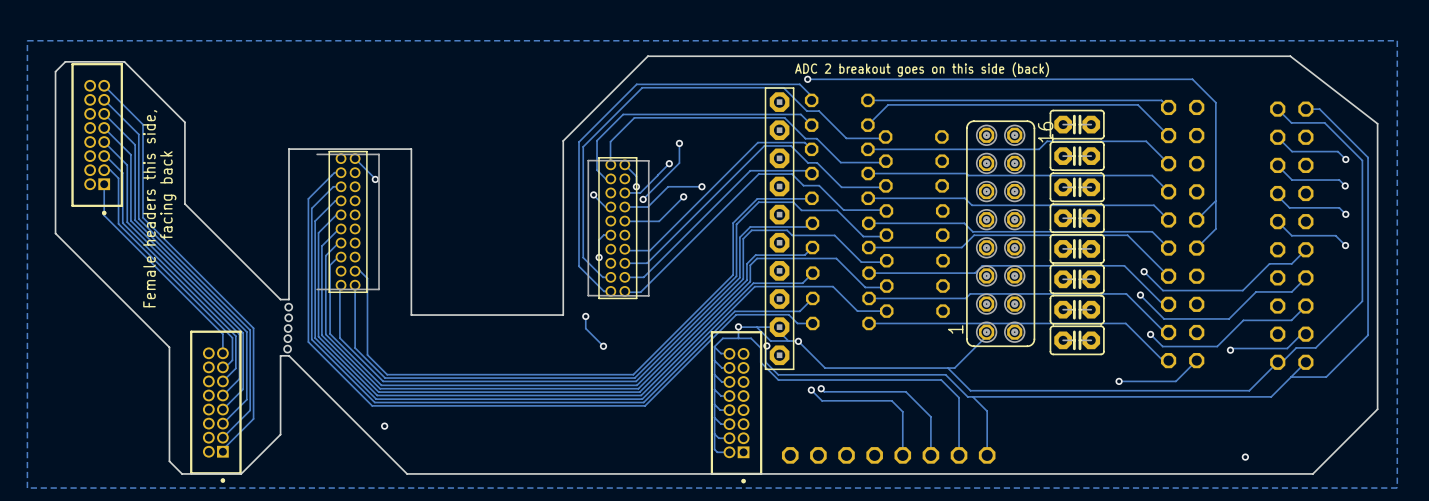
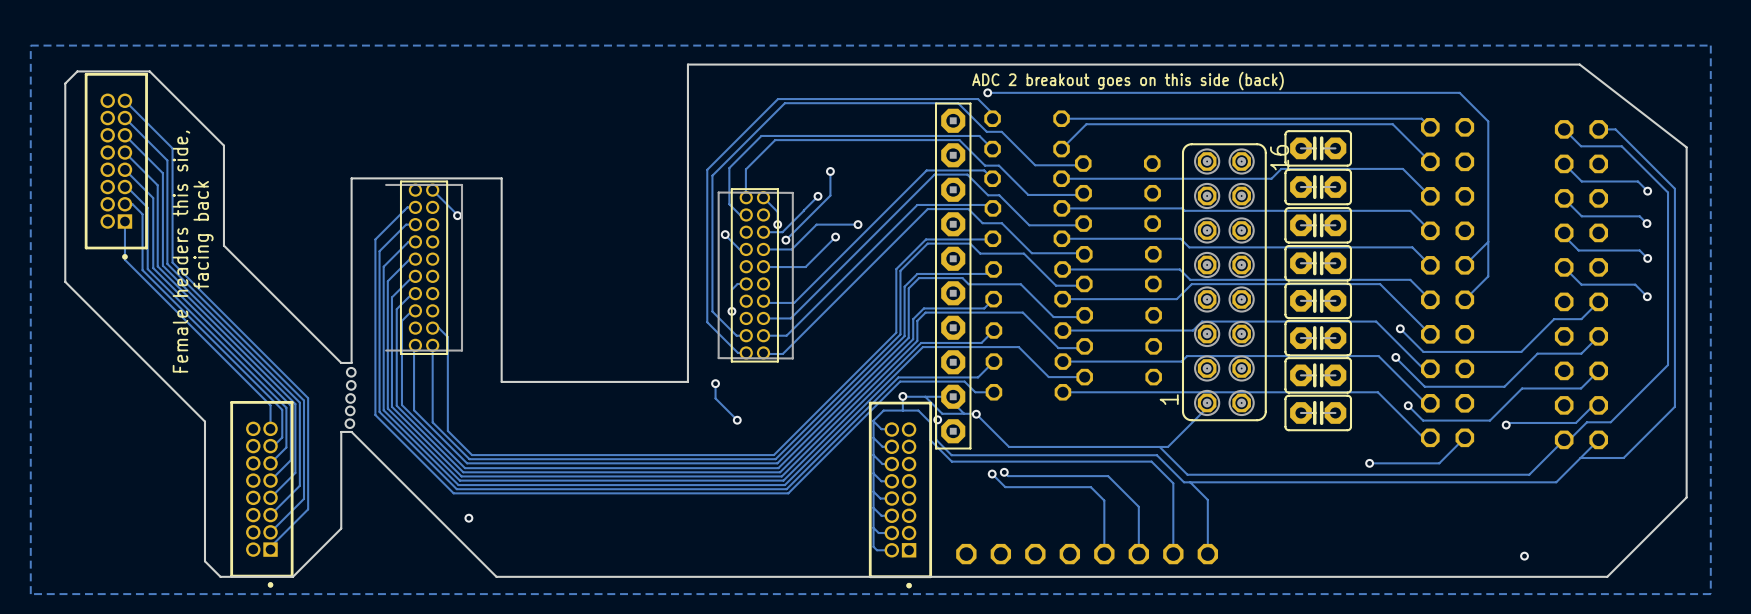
board edge: (647, 56) (563, 140) -> (791, 64) (687, 64) (687, 168)

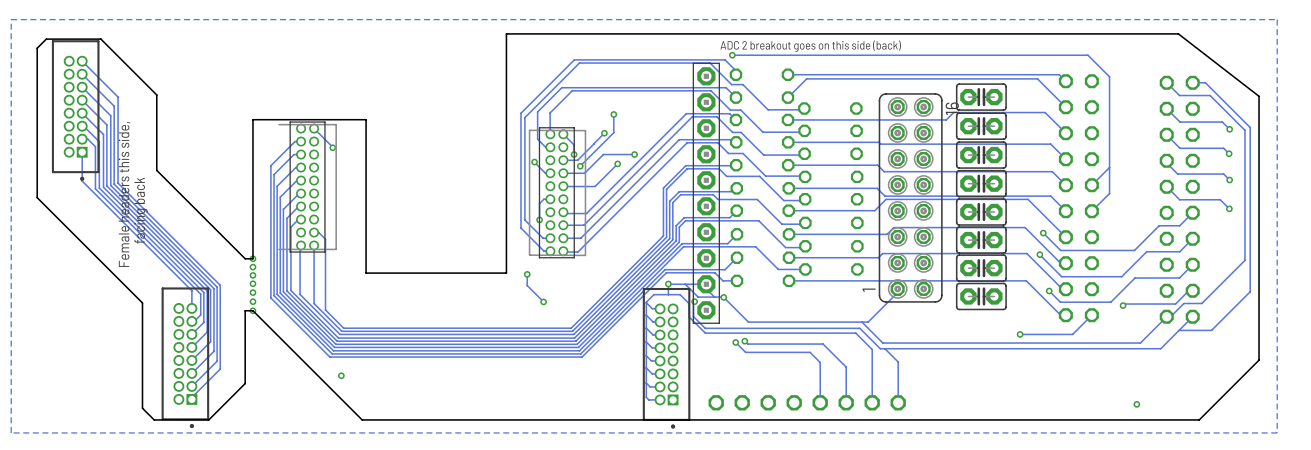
via: none -> (252, 258)
round board edge: [345, 366, 357, 378] -> none
via: none -> (252, 267)
round board edge: [345, 380, 357, 391] -> none
via: none -> (252, 275)
round board edge: [345, 393, 356, 404] -> none
via: none -> (252, 283)
round board edge: [344, 405, 356, 417] -> none
via: none -> (252, 292)
round board edge: [344, 418, 356, 430] -> none
via: none -> (252, 301)
via: none -> (252, 310)

